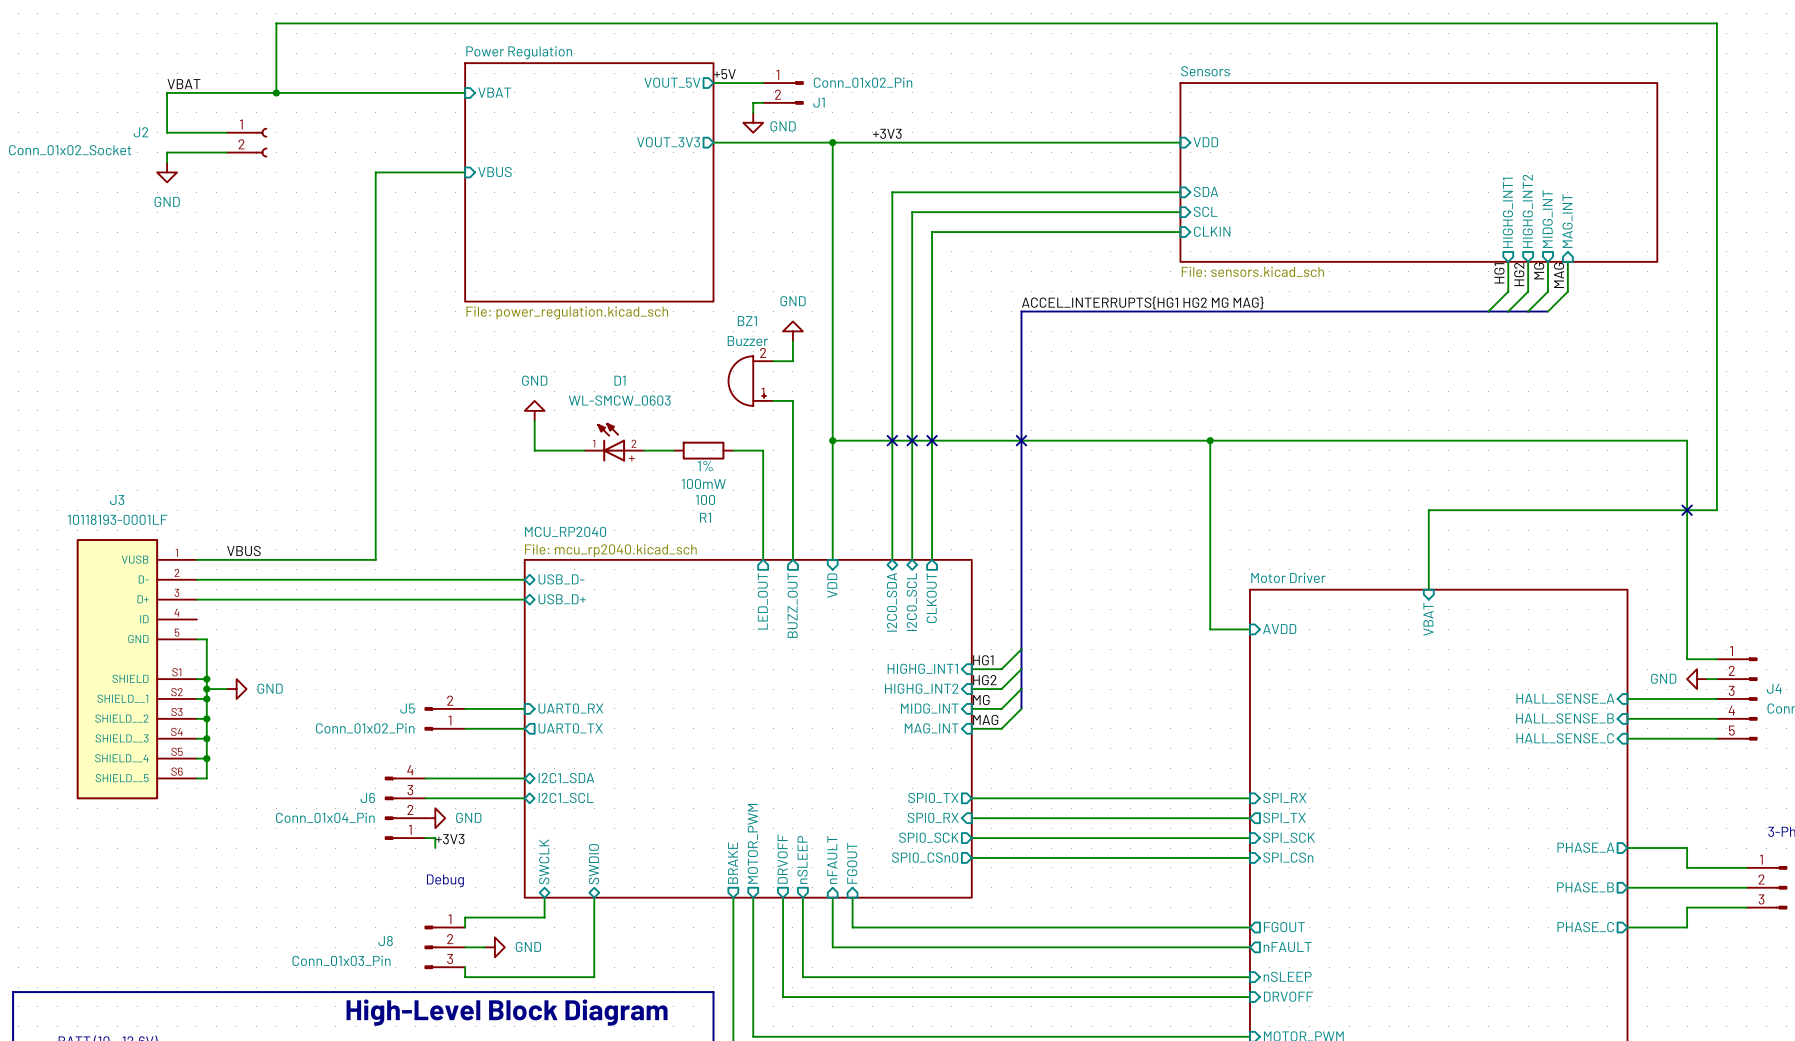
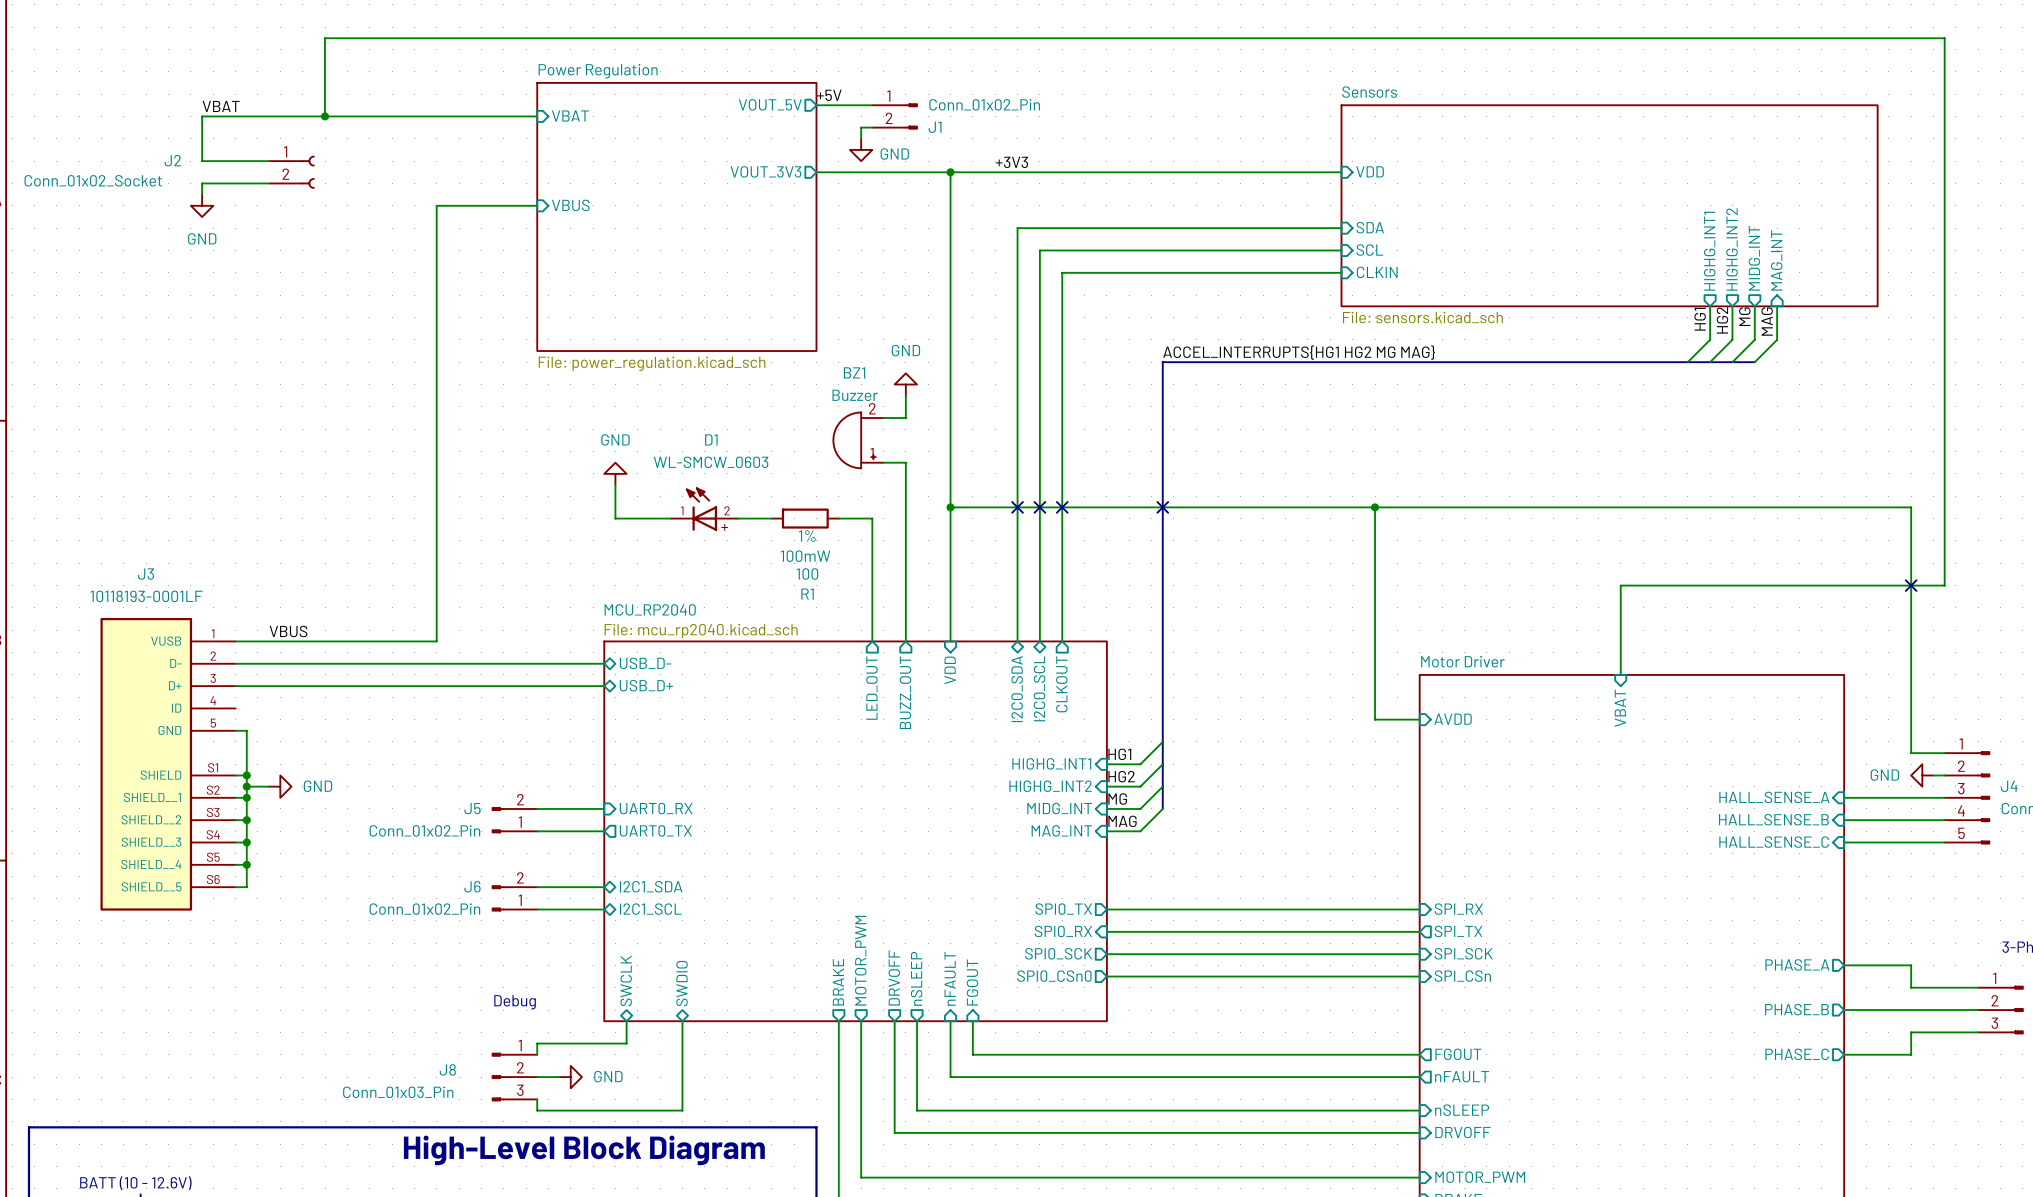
J6 symbol: [385, 776, 426, 840] -> [491, 885, 538, 912]
J6 value: Conn_01x04_Pin (325, 817) -> Conn_01x02_Pin (424, 909)
power symbol: GND (435, 818) -> none
wire: (425, 838) (435, 838) (435, 848) -> none
label: +3V3 (450, 839) -> none

